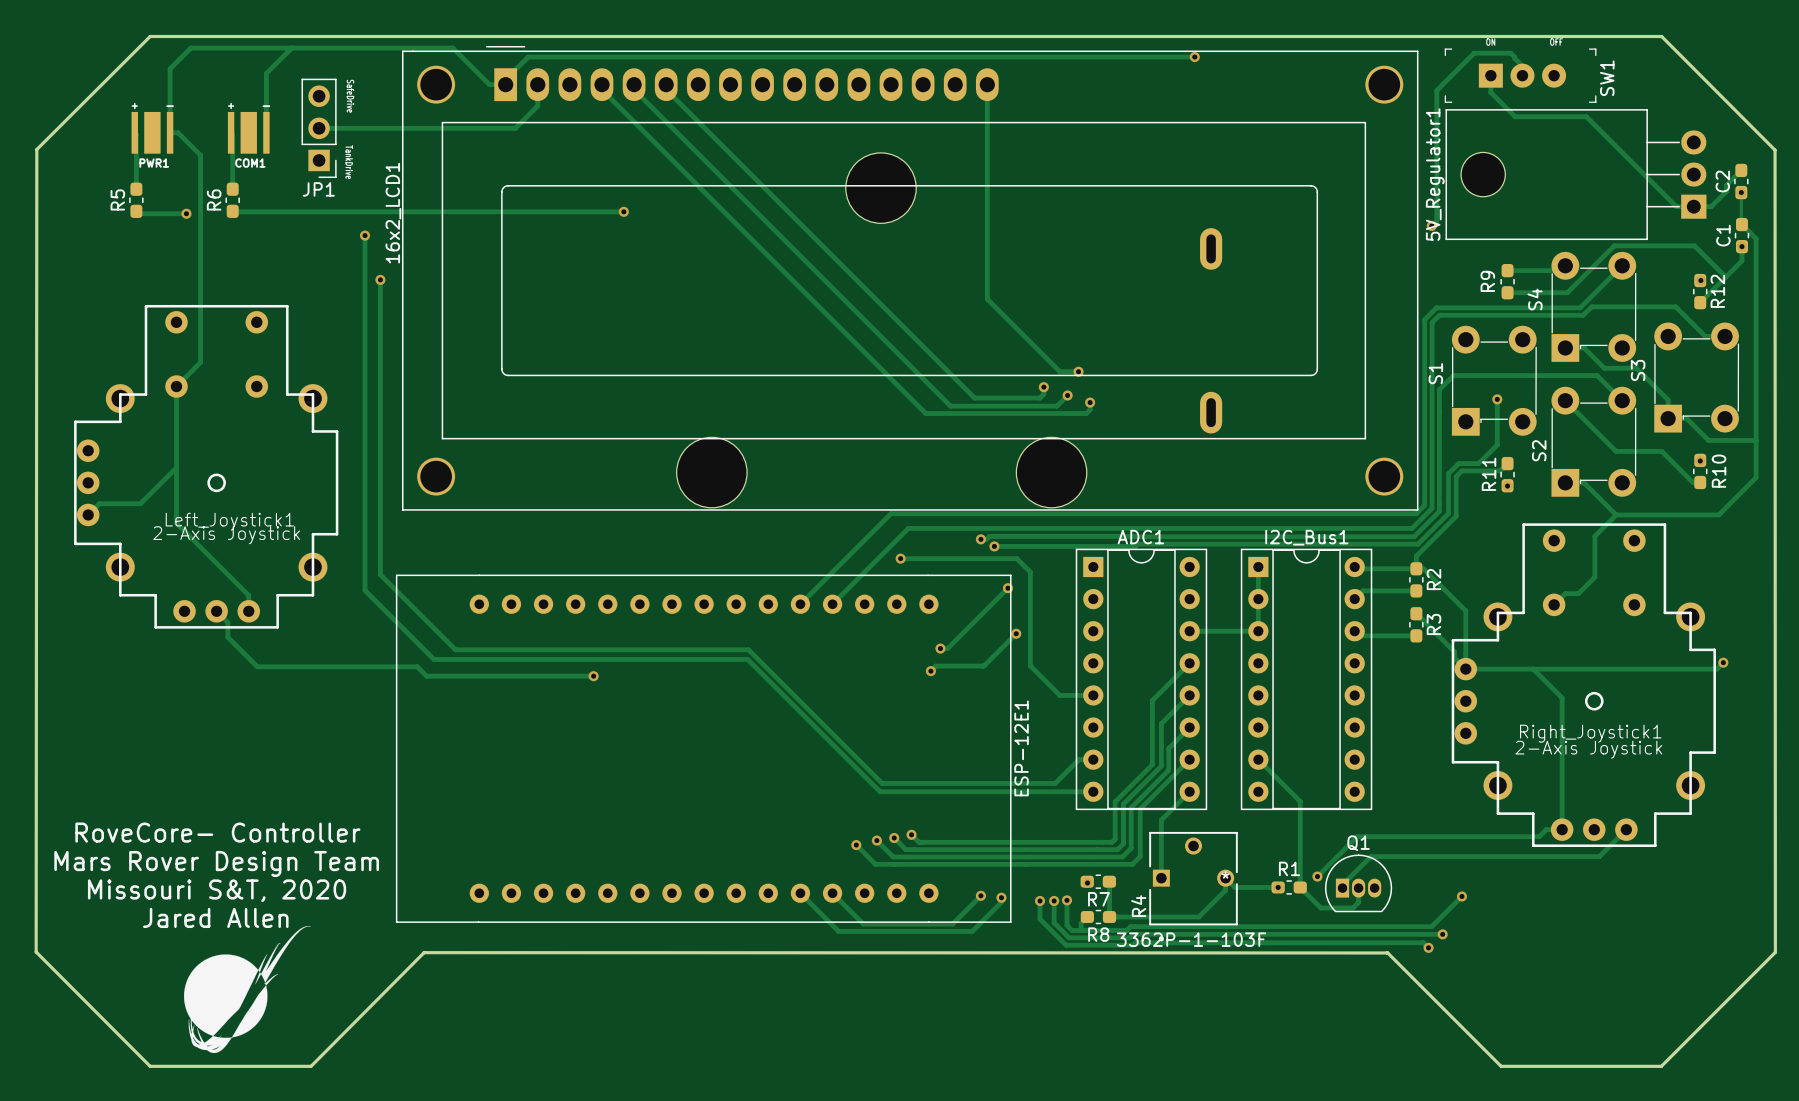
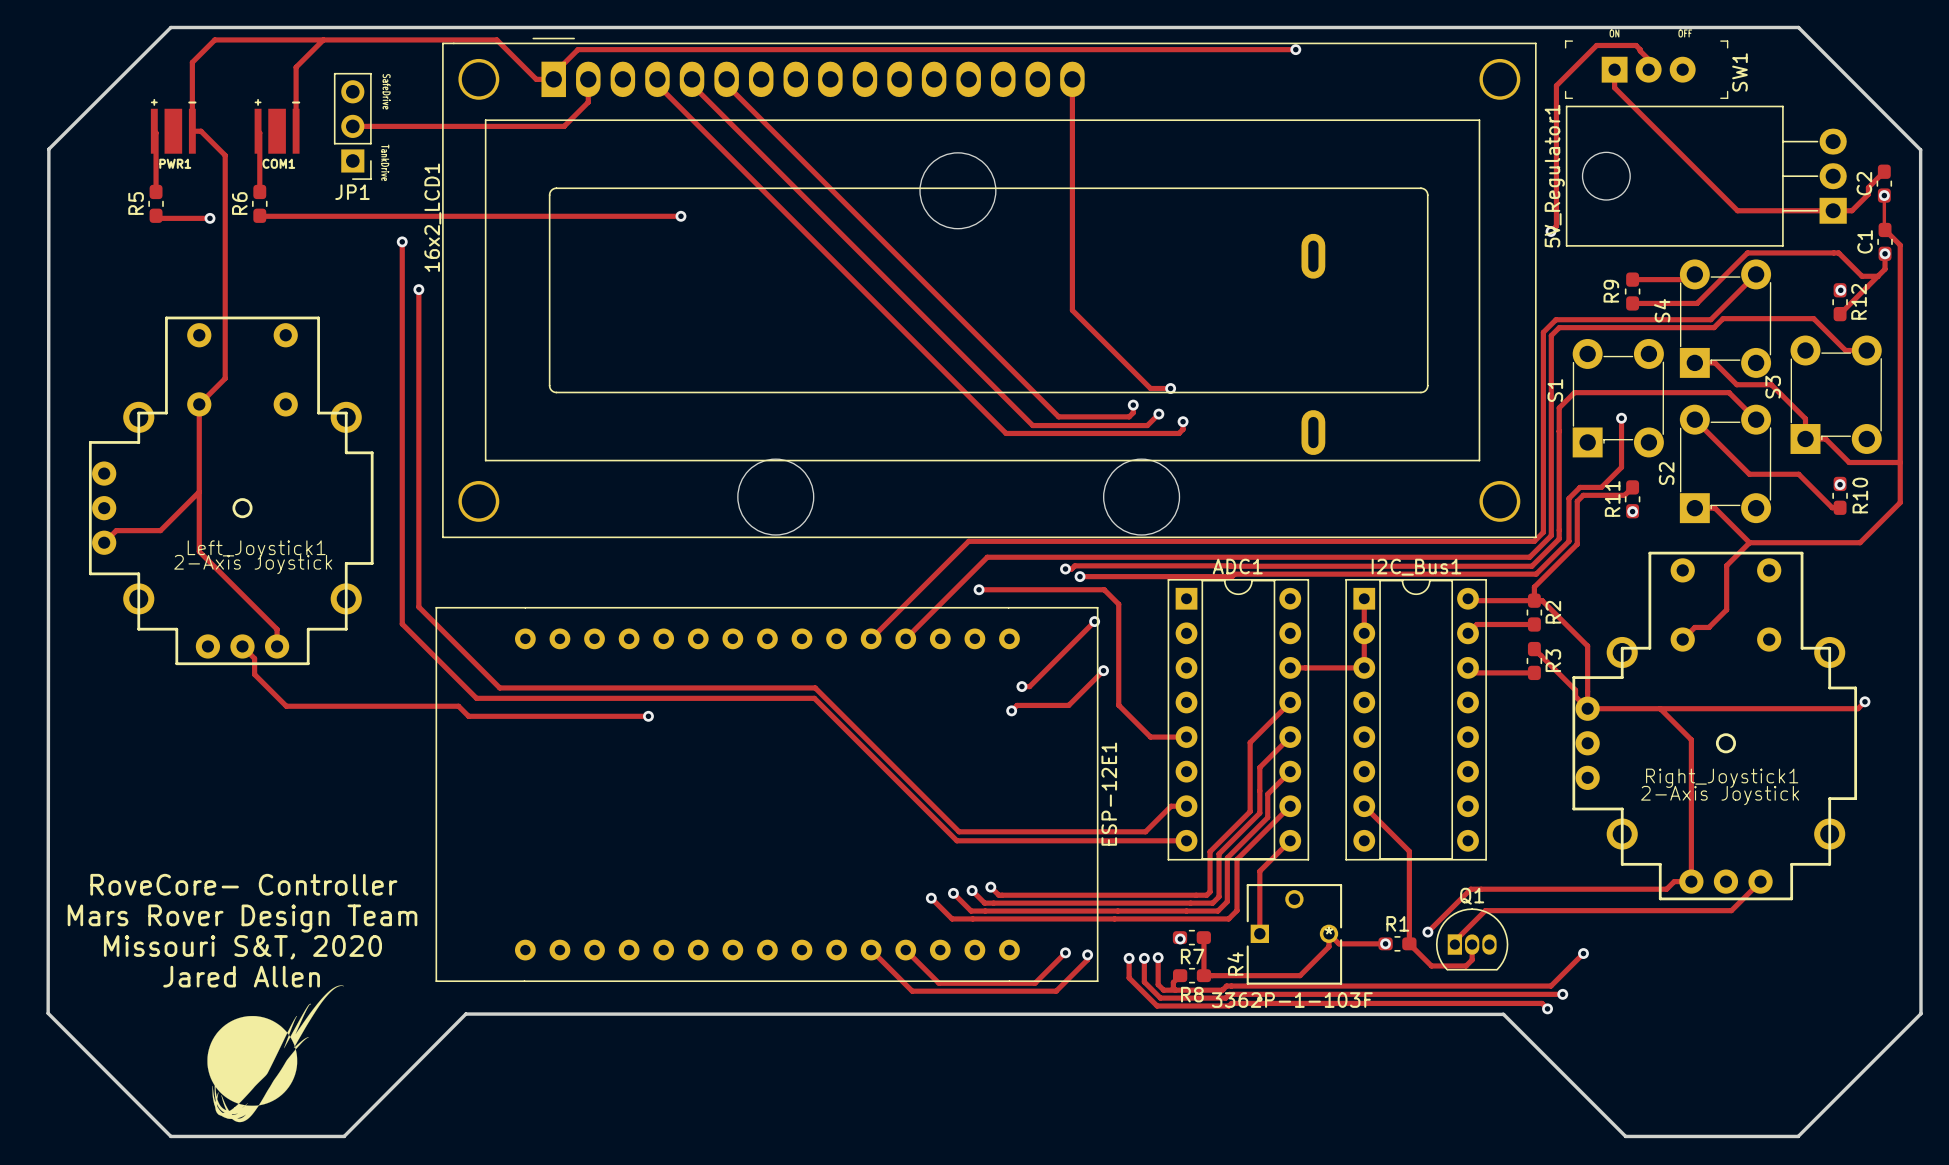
track: (1515, 116) (1586, 116) (1676, 206) -> (1640, 113) (1737, 210) (1814, 210)
track: (1694, 245) (1725, 277) -> none
track: none -> (1834, 252) (1838, 252) (1862, 276) (1877, 276)

